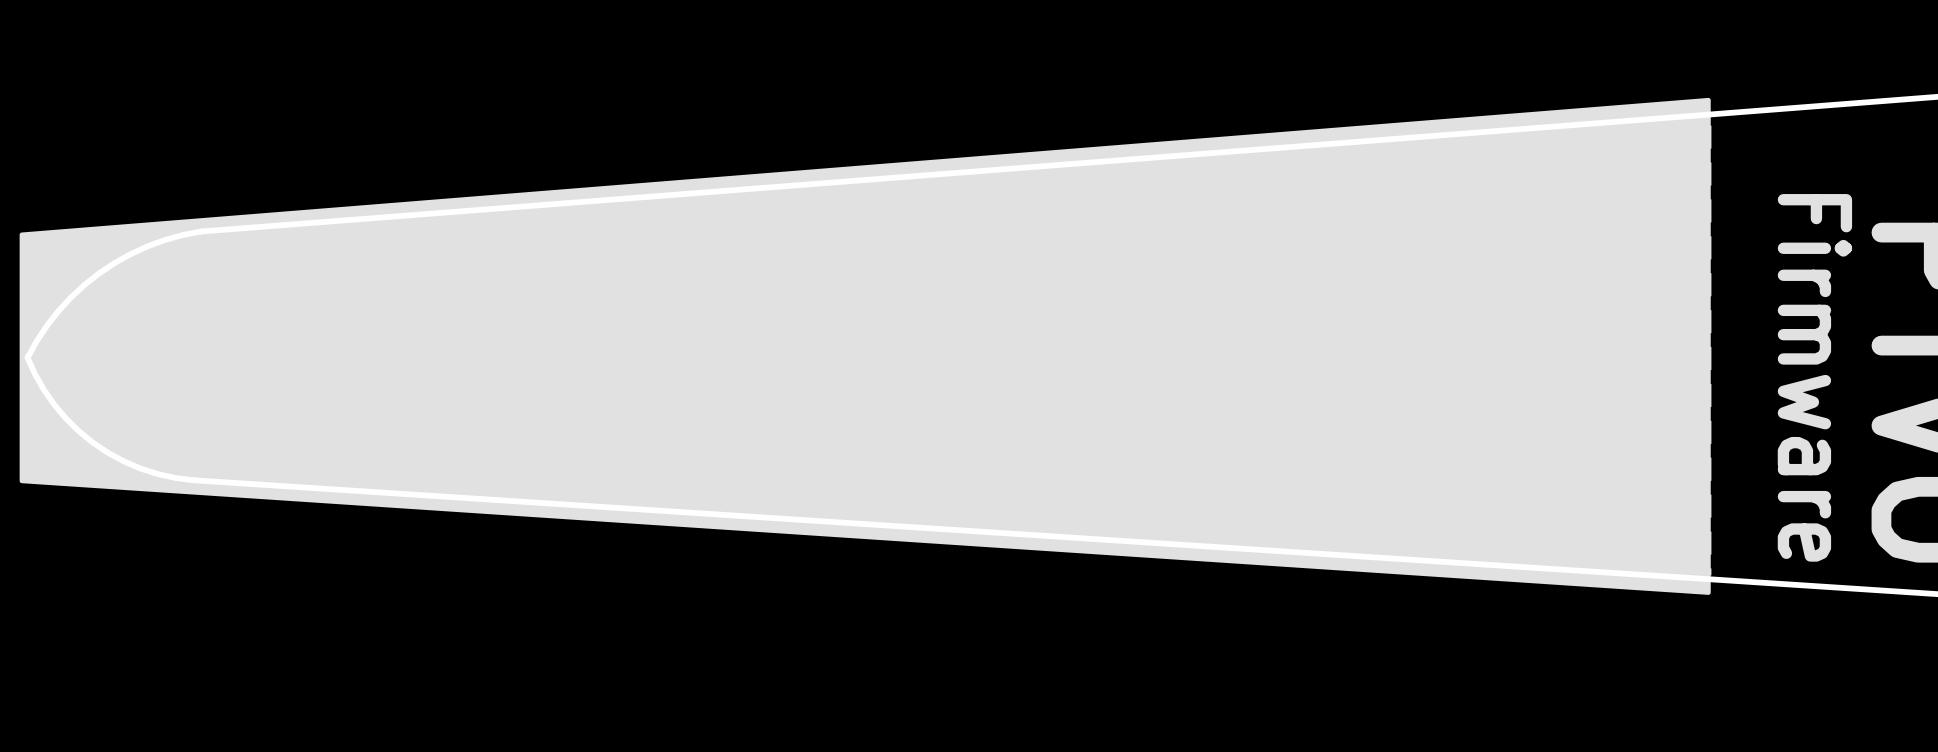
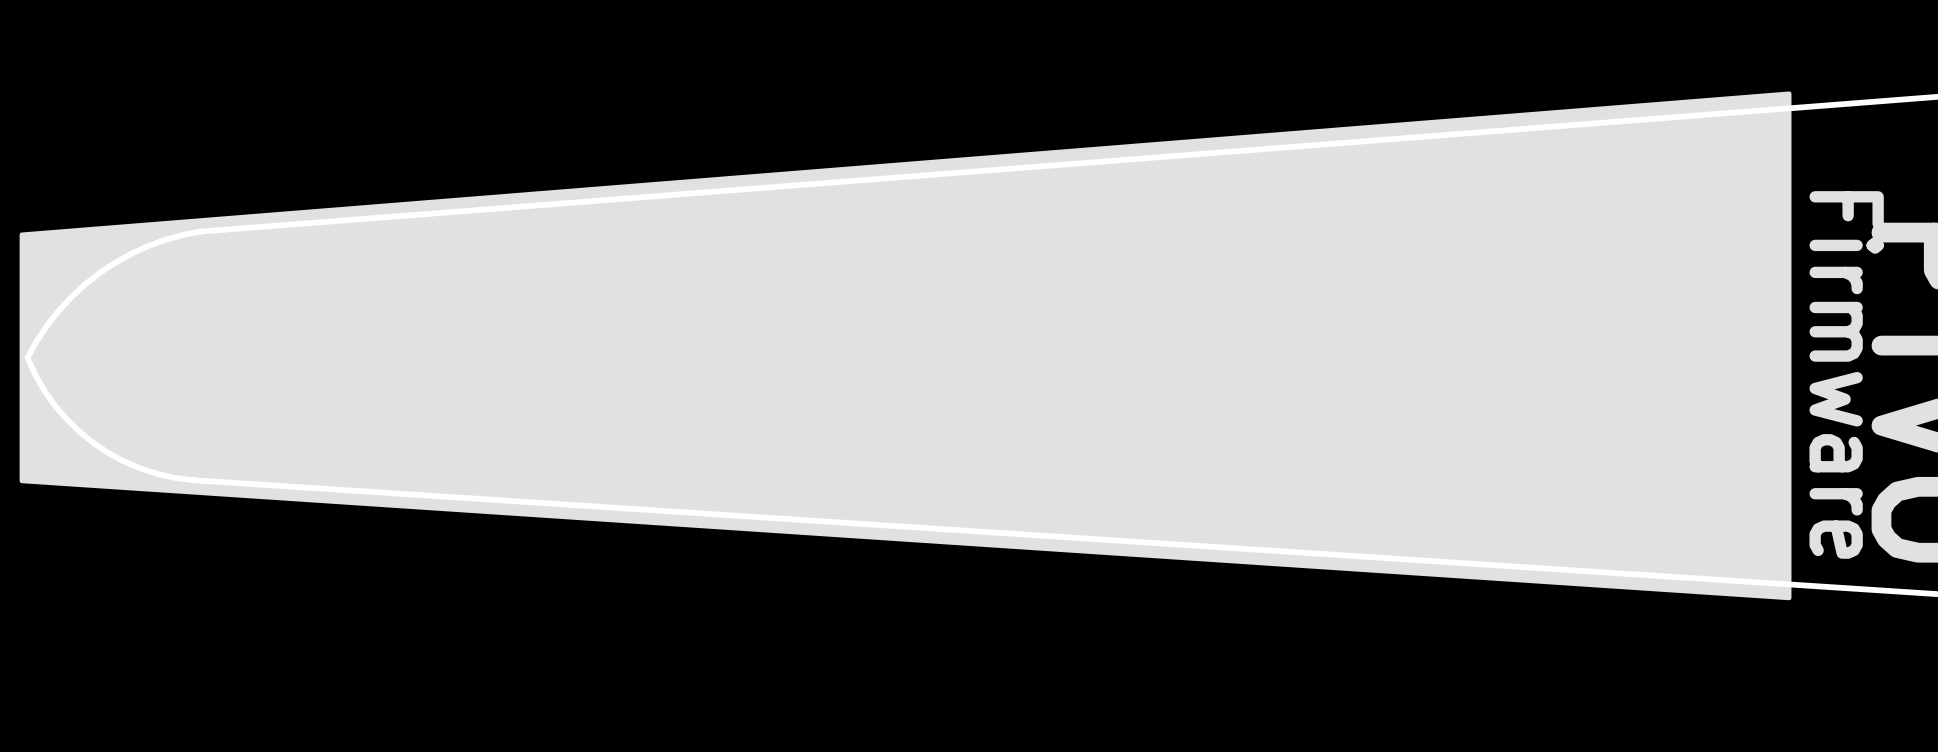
drawing: none -> [19, 91, 1792, 601]
drawing: [19, 97, 1711, 595] -> none
text position: Firmware (1814, 377) -> Firmware (1846, 374)

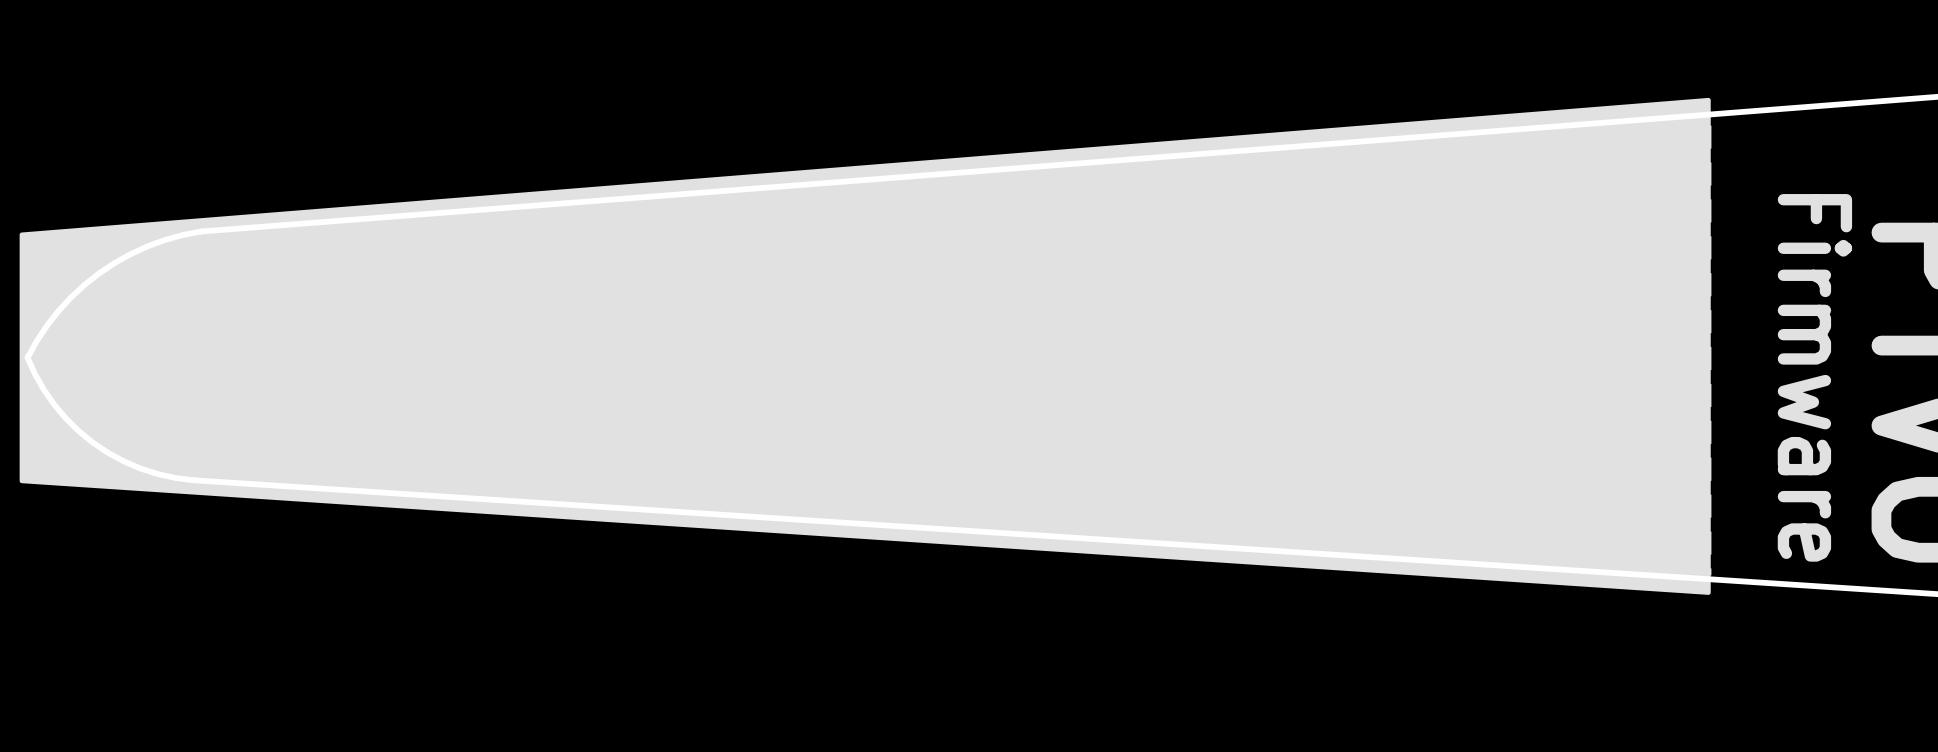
drawing: [19, 91, 1792, 601] -> none
drawing: none -> [19, 97, 1711, 595]
text position: Firmware (1846, 374) -> Firmware (1814, 377)

